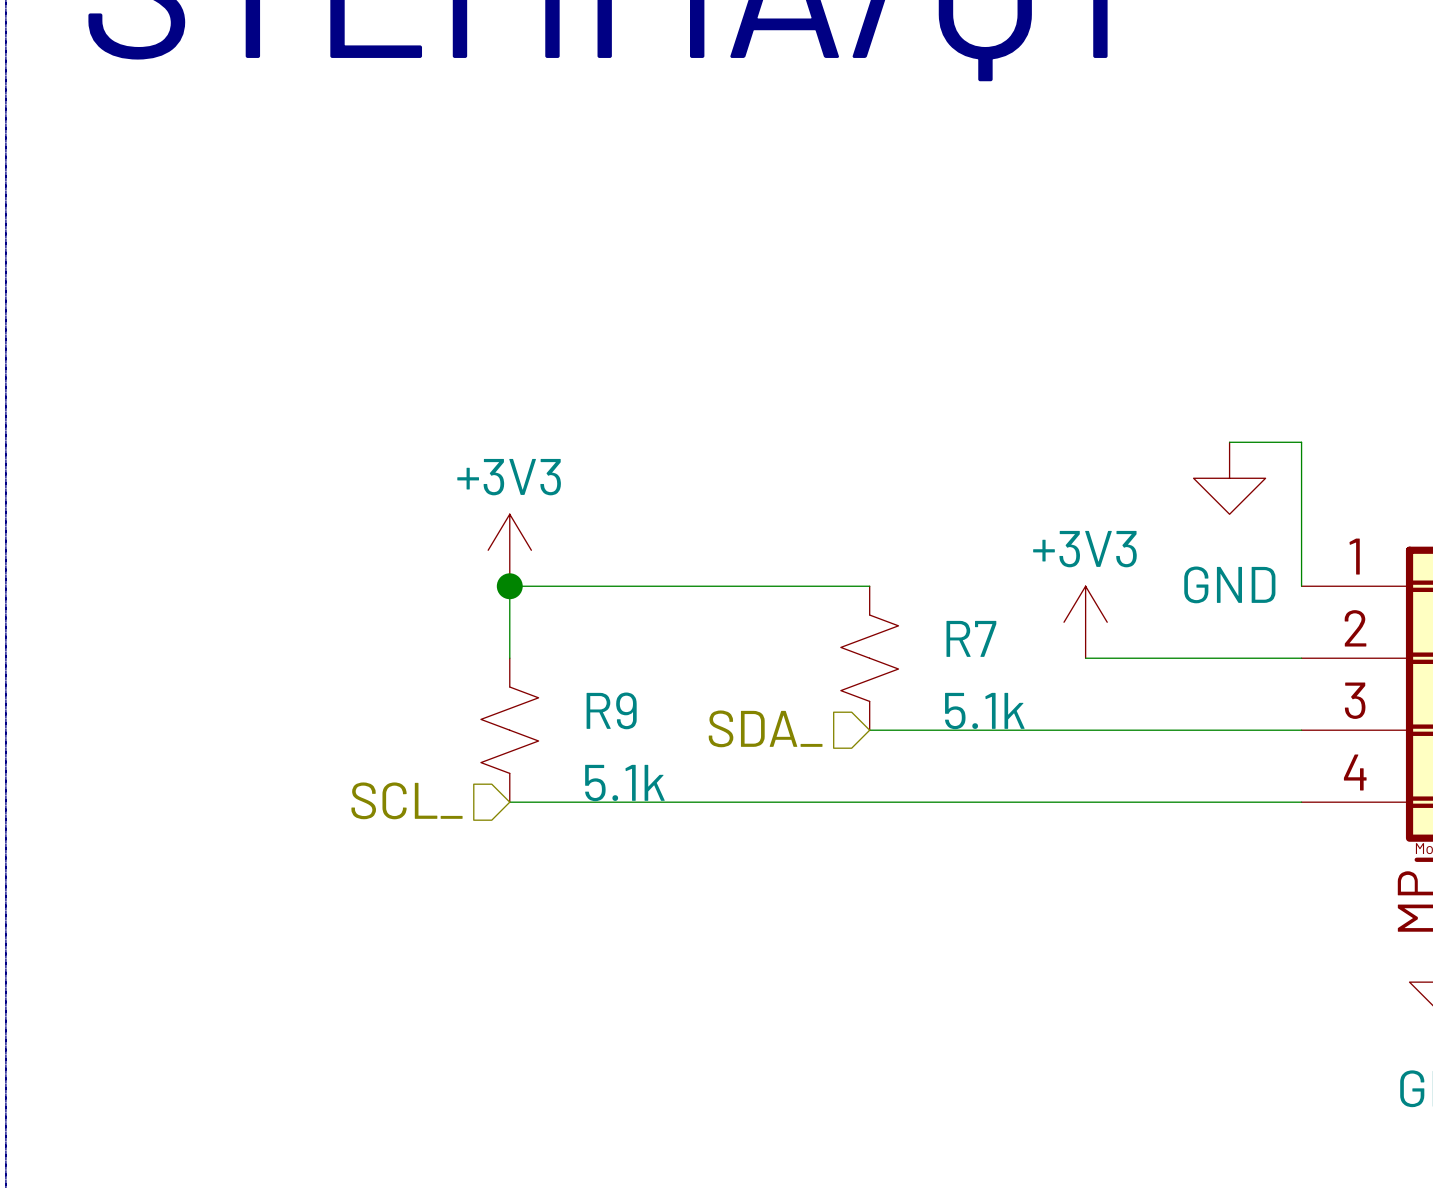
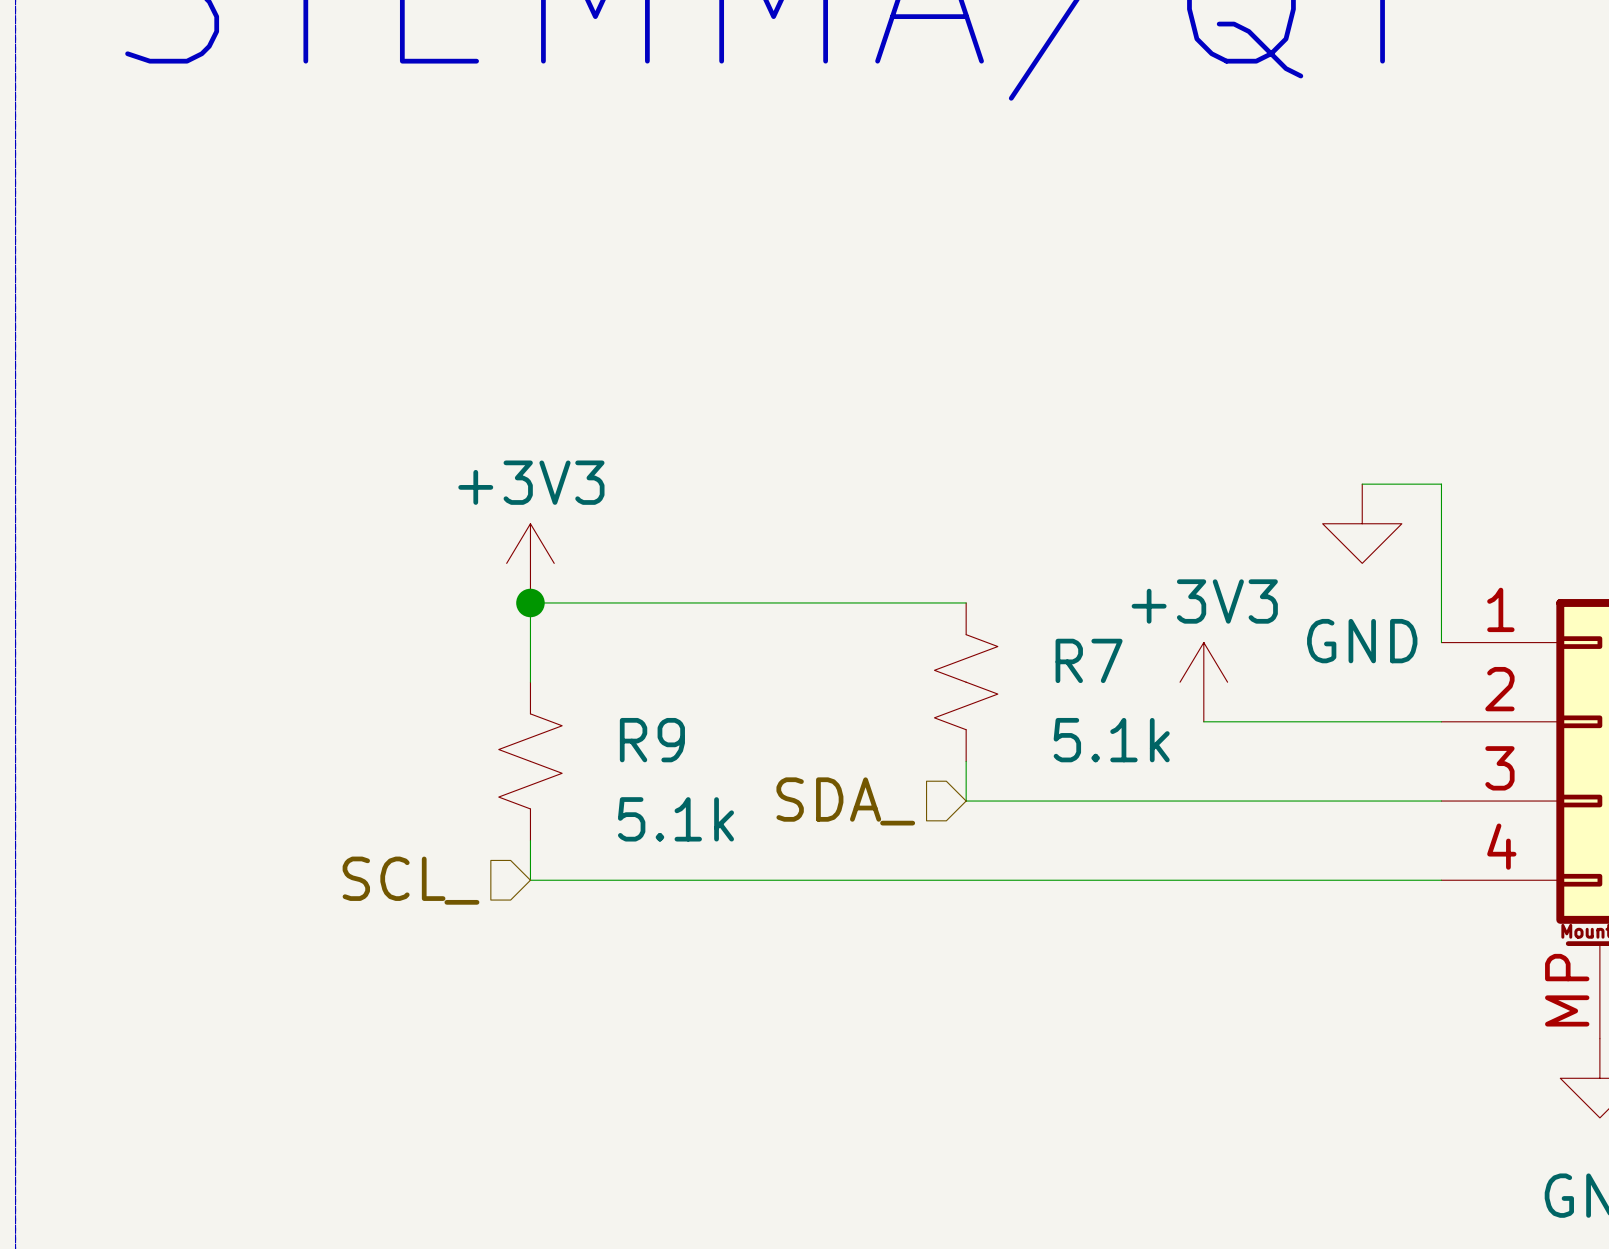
power symbol position: +3V3 (509, 550) -> +3V3 (530, 563)
wire: none -> (966, 602) (530, 602) (530, 682)
junction position: (509, 586) -> (530, 602)
wire: (869, 586) (509, 586) (509, 658) -> none
R7 position: (869, 658) -> (966, 682)
R9 position: (509, 730) -> (530, 761)
wire: none -> (530, 840) (530, 880) (570, 880)
hierarchical label position: SCL_ (407, 800) -> SCL_ (411, 880)

